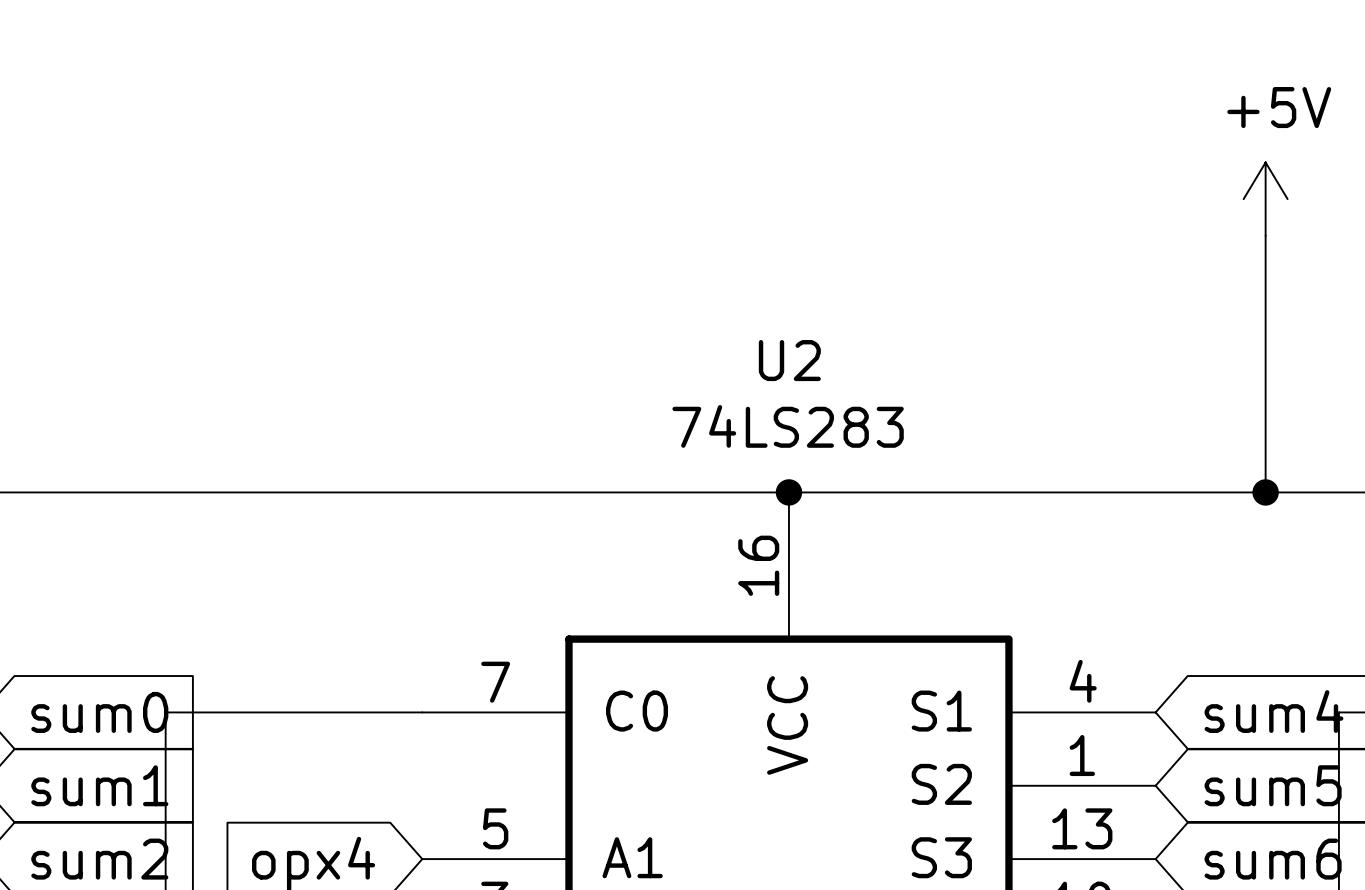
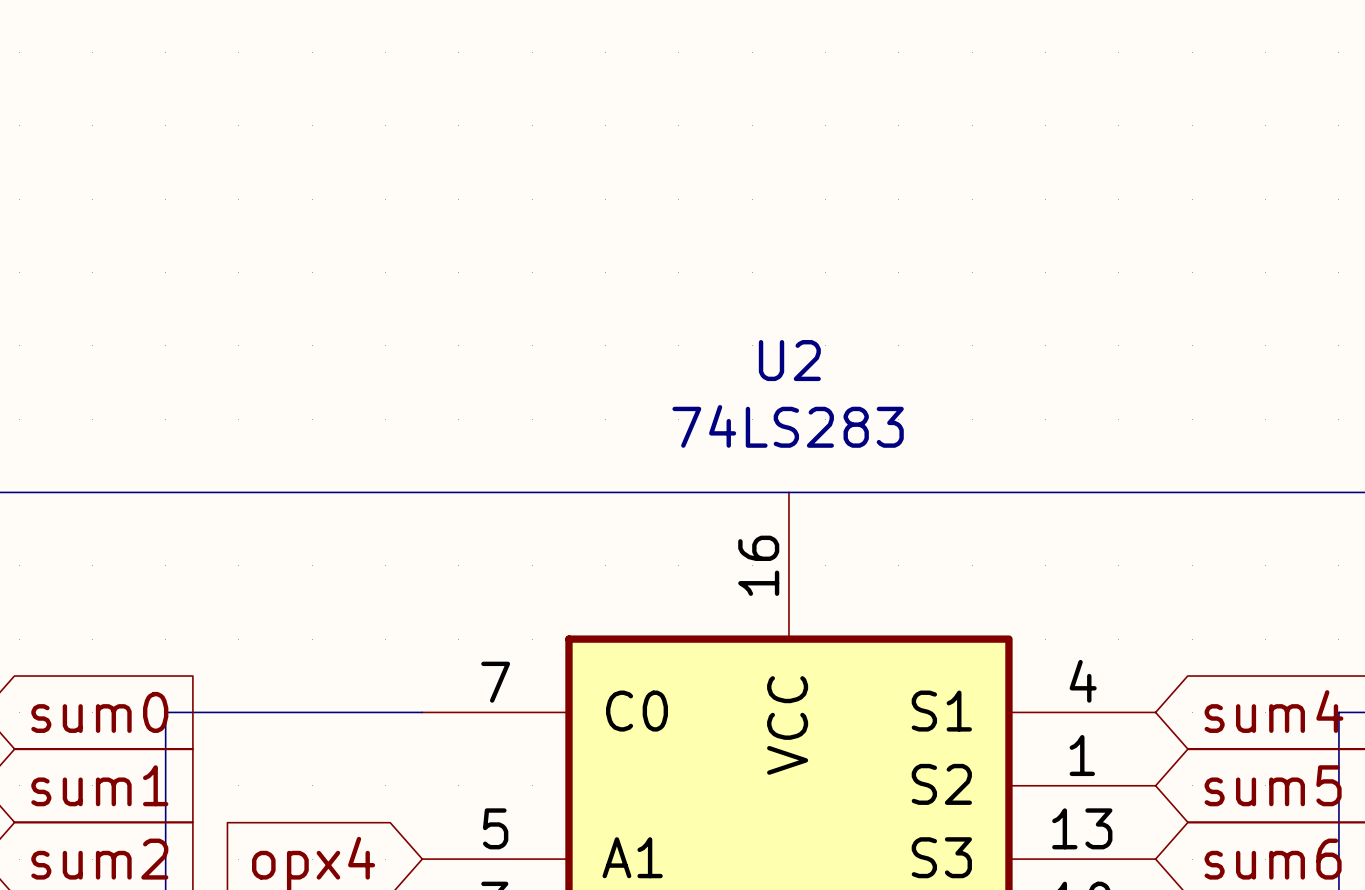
power symbol: +5V (1265, 199) -> none
wire: (1265, 235) (1265, 492) -> none
junction: (788, 492) -> none
junction: (1265, 492) -> none

